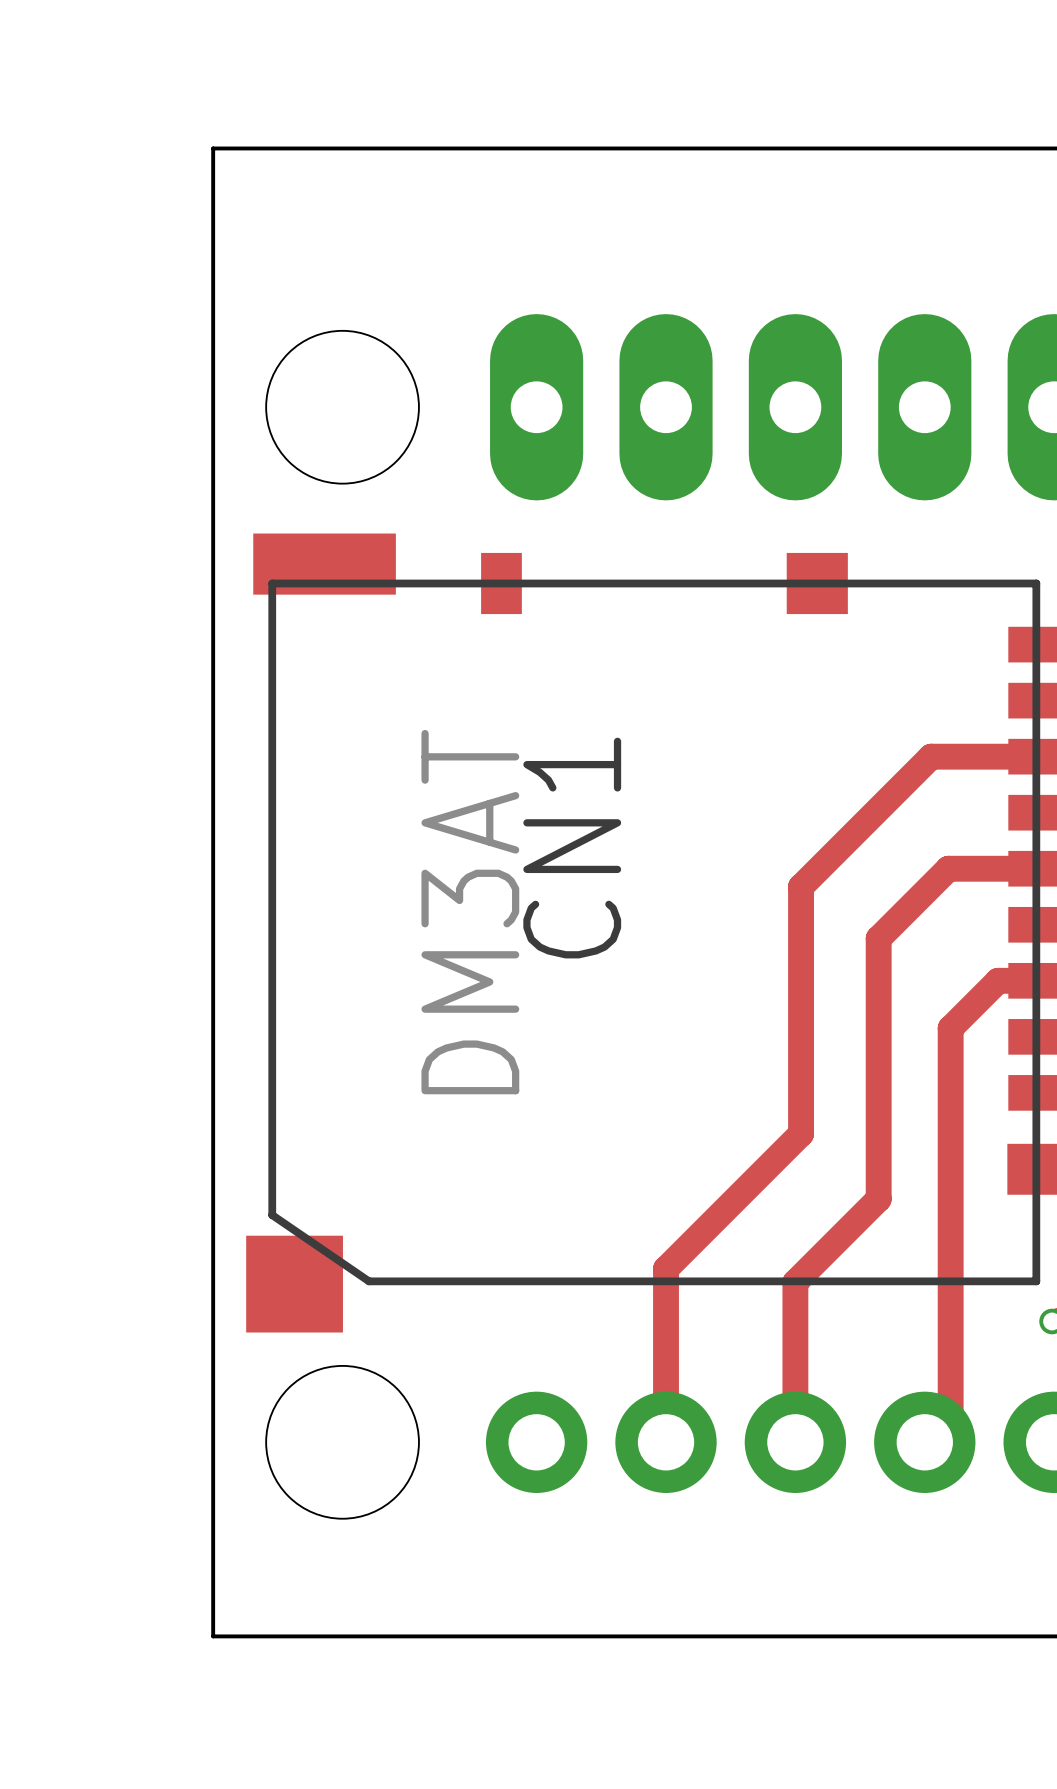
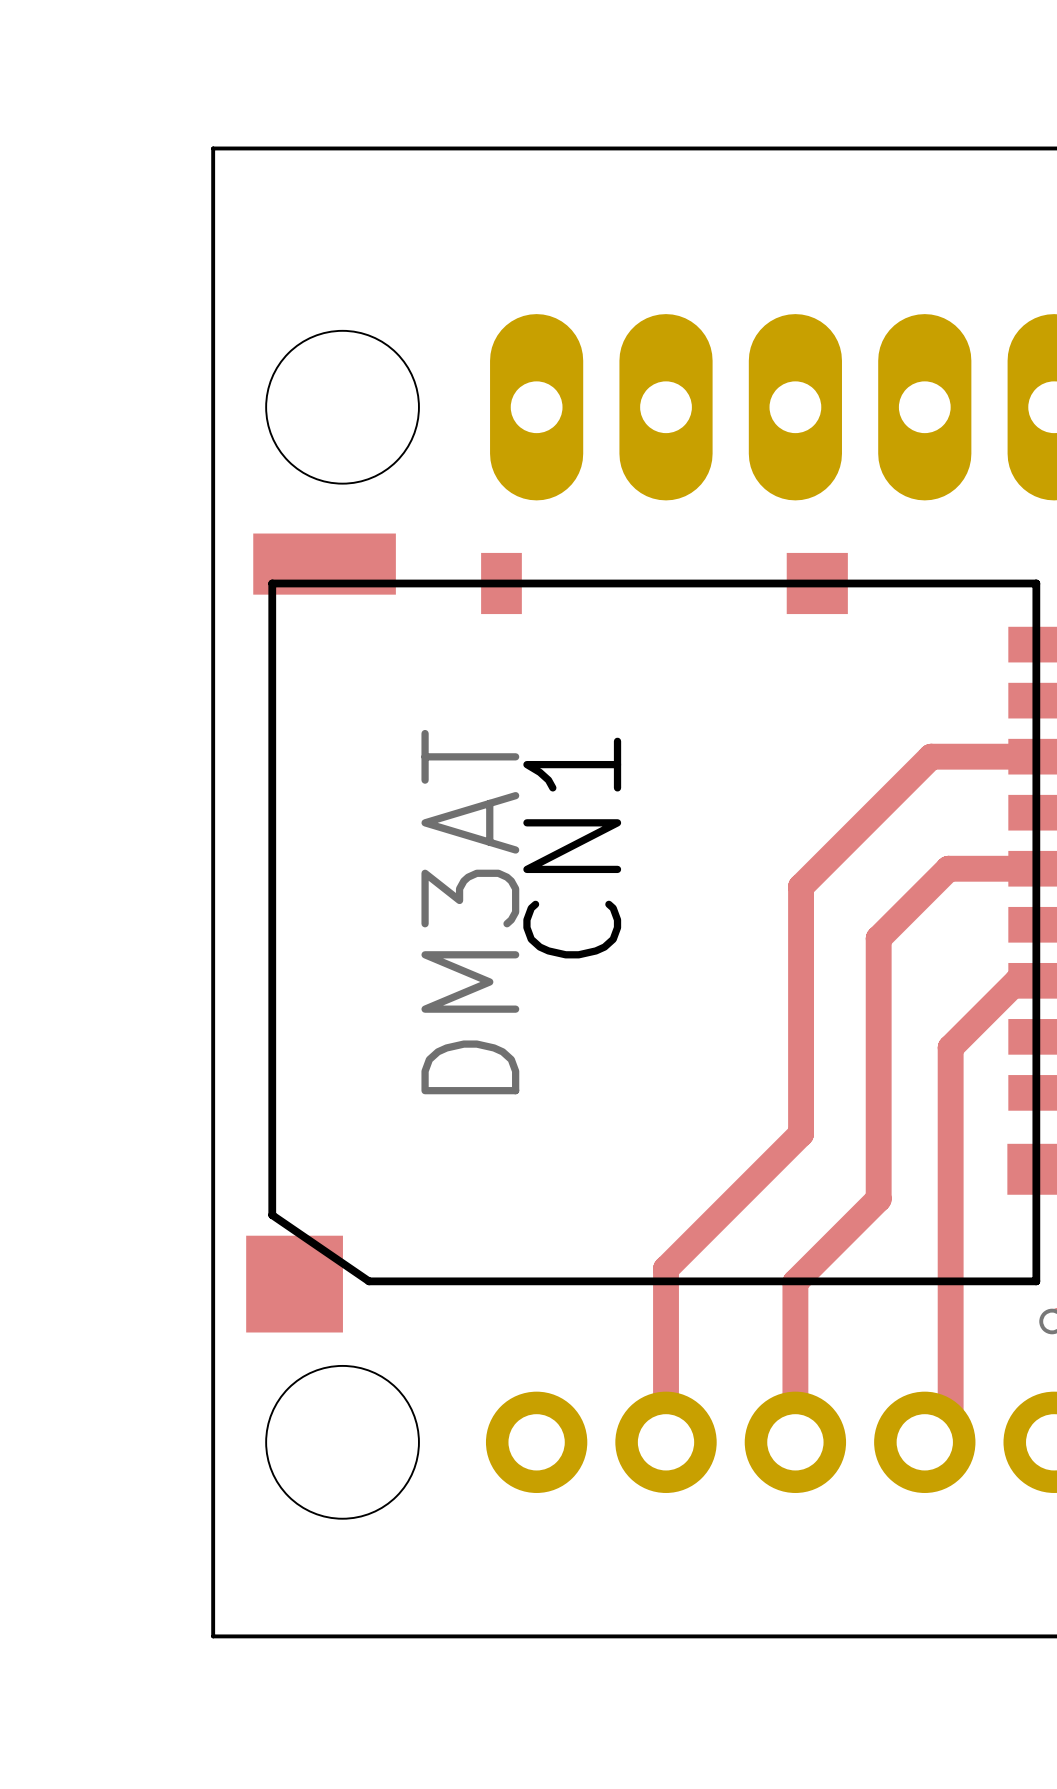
track: (1017, 980) (998, 980) (950, 1028) (950, 1047) -> (1017, 980) (950, 1047)

